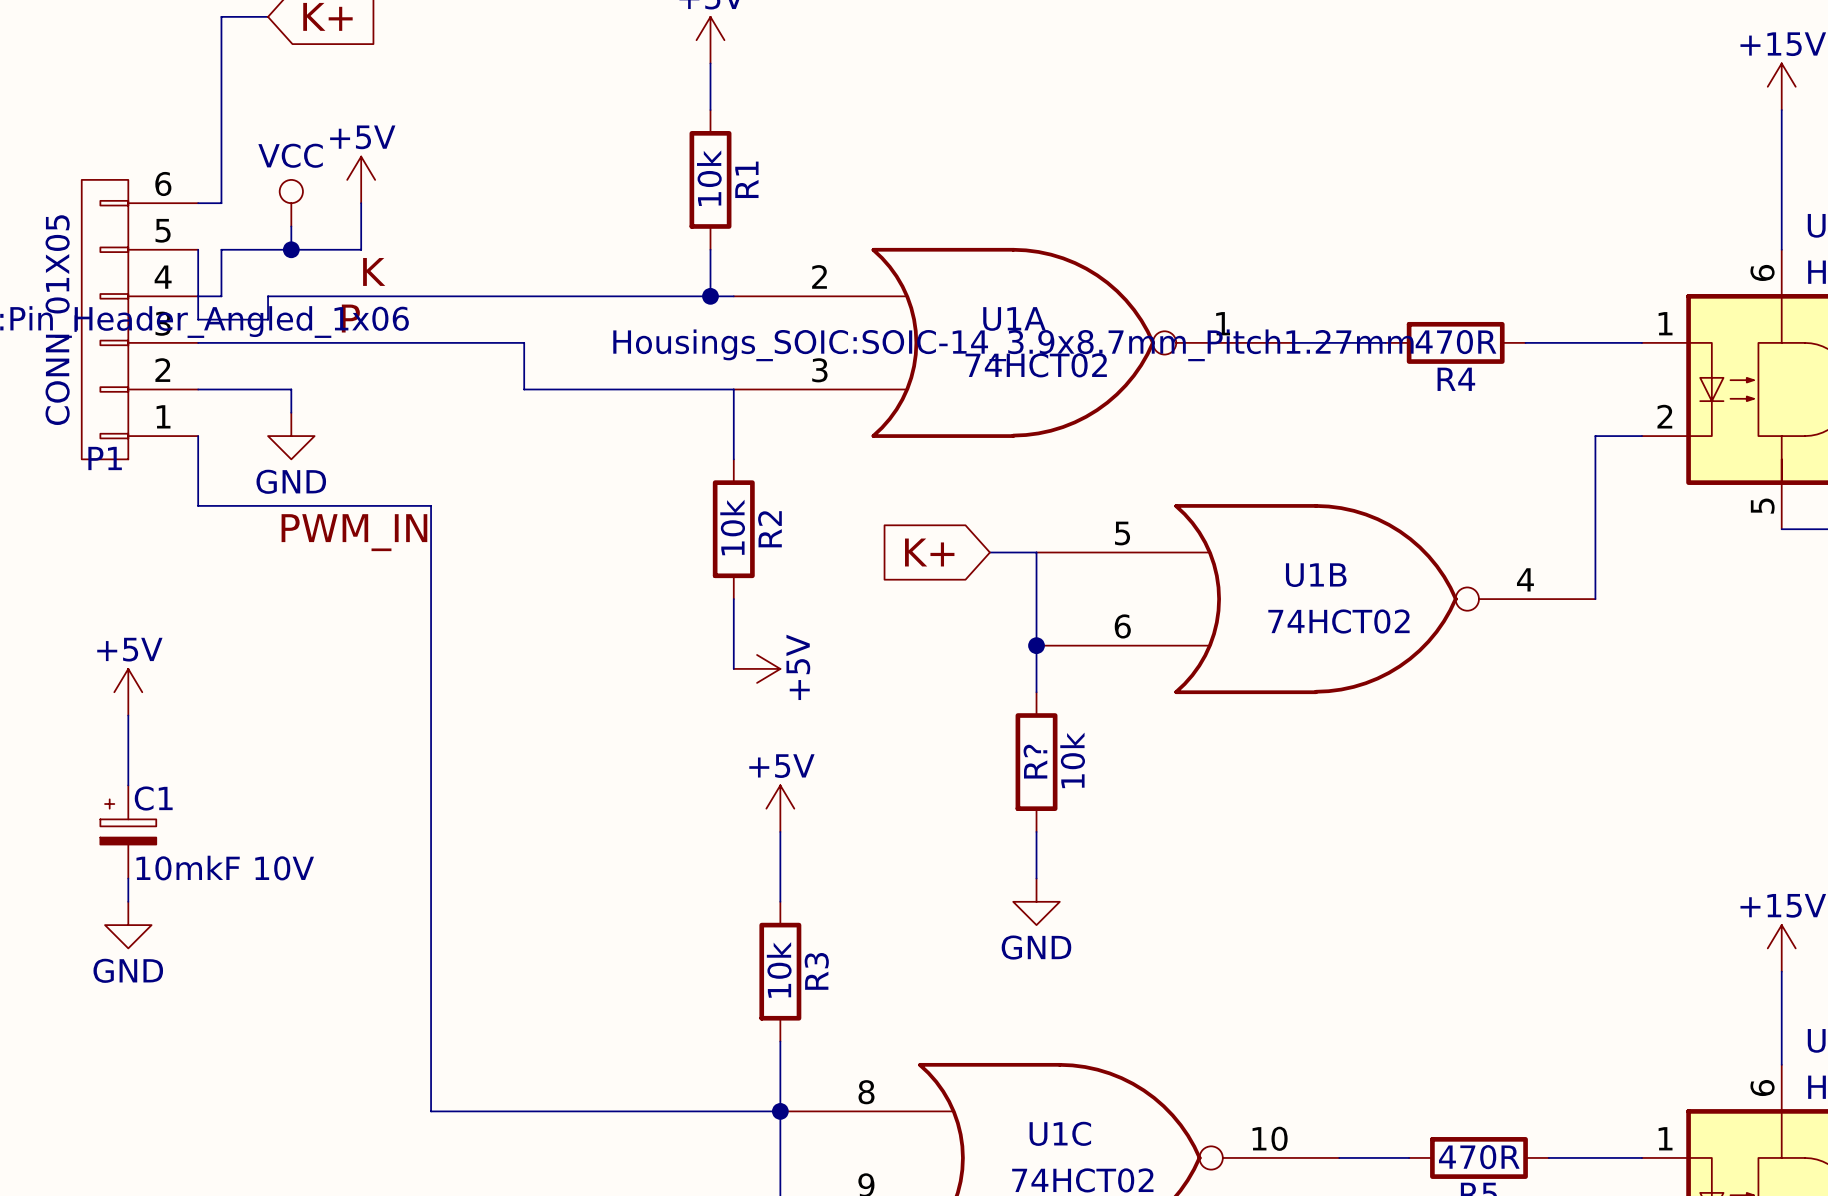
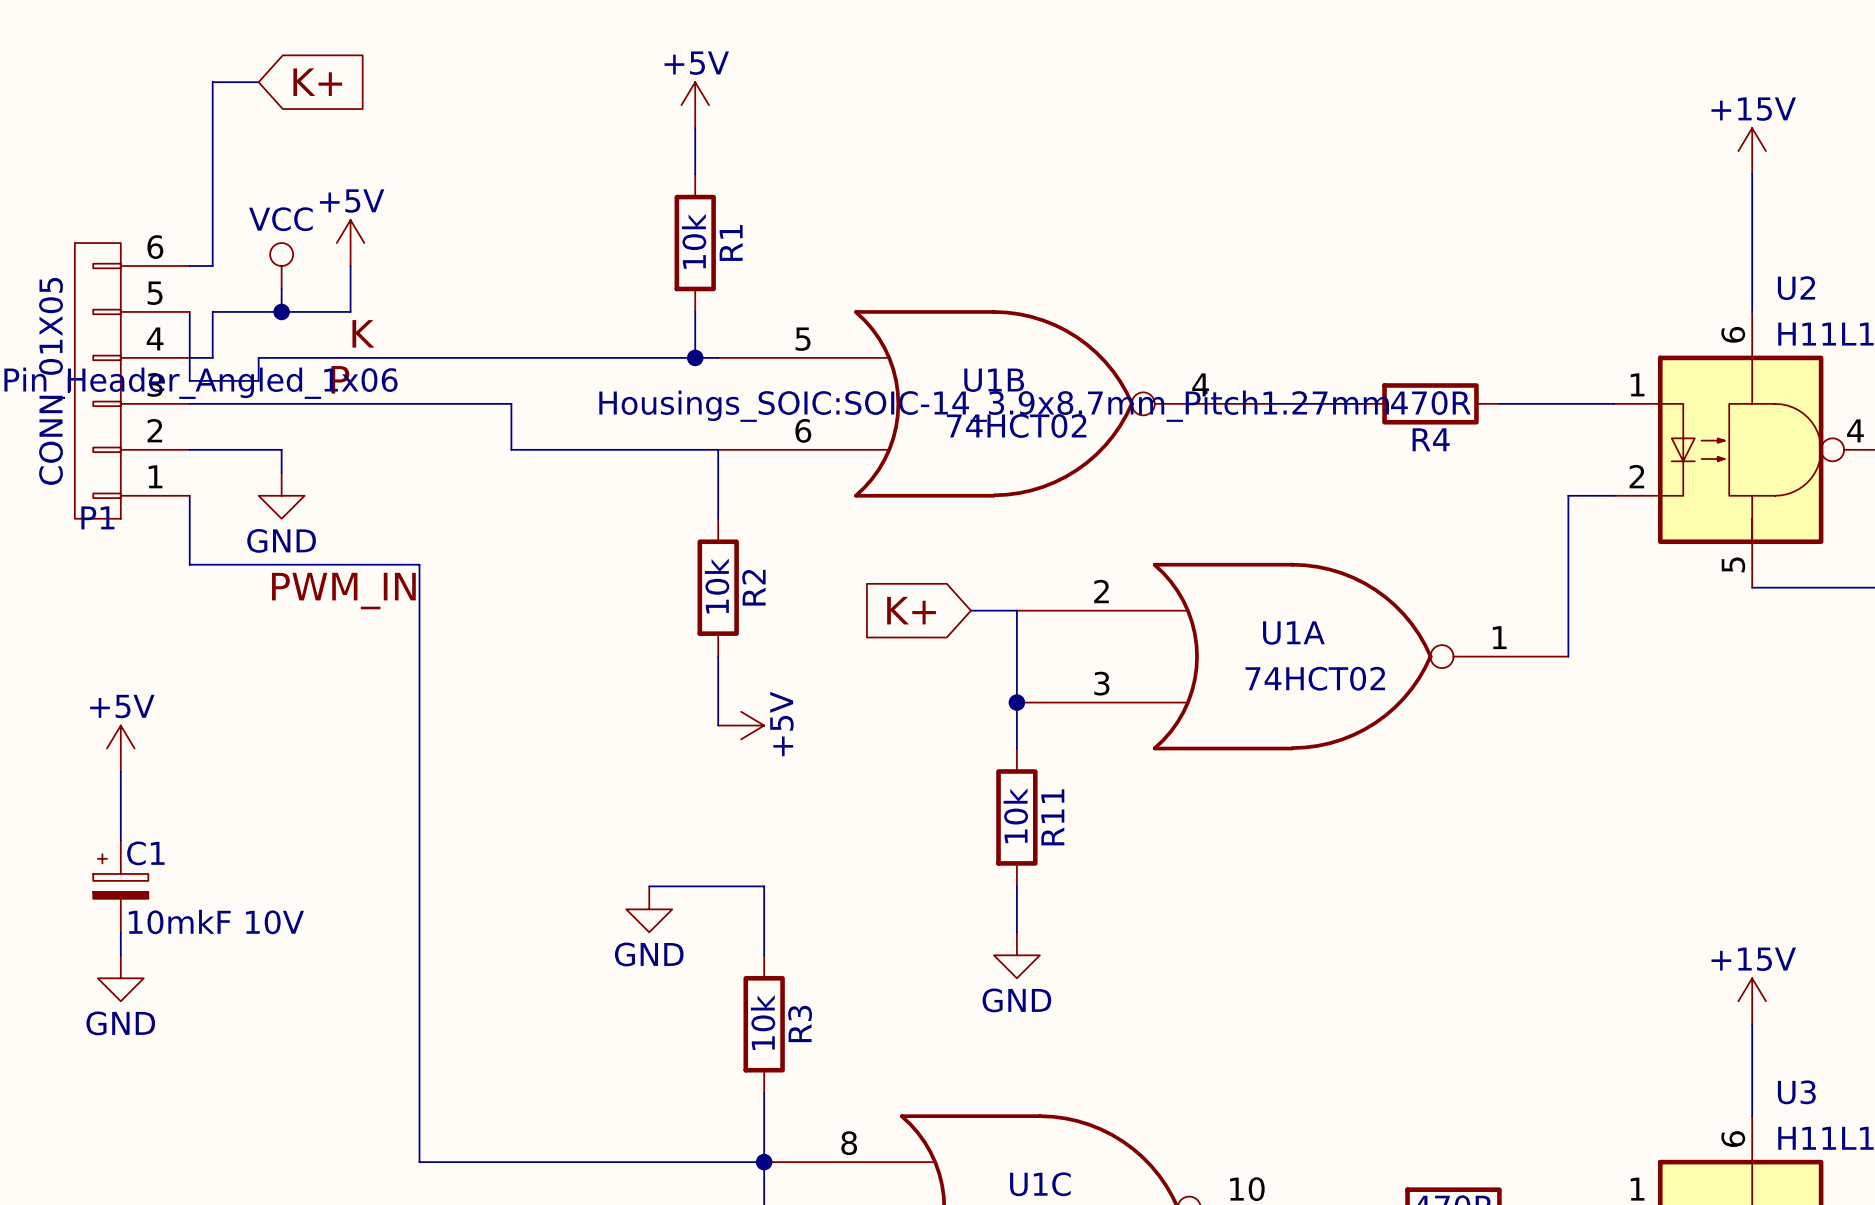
U1A position: (1013, 342) -> (1292, 656)
U1A text: Housings_SOIC:SOIC-14_3.9x8.7mm_Pitch1.27mm (1013, 345) -> none
U1B text: none -> Housings_SOIC:SOIC-14_3.9x8.7mm_Pitch1.27mm (994, 406)
U1B position: (1315, 599) -> (993, 403)
10k name: 10k (1072, 760) -> R11 (1052, 817)
10k value: R? (1035, 761) -> 10k (1015, 815)
power symbol: +5V (780, 808) -> none
wire: none -> (649, 886) (764, 886)
power symbol: none -> GND (649, 909)

